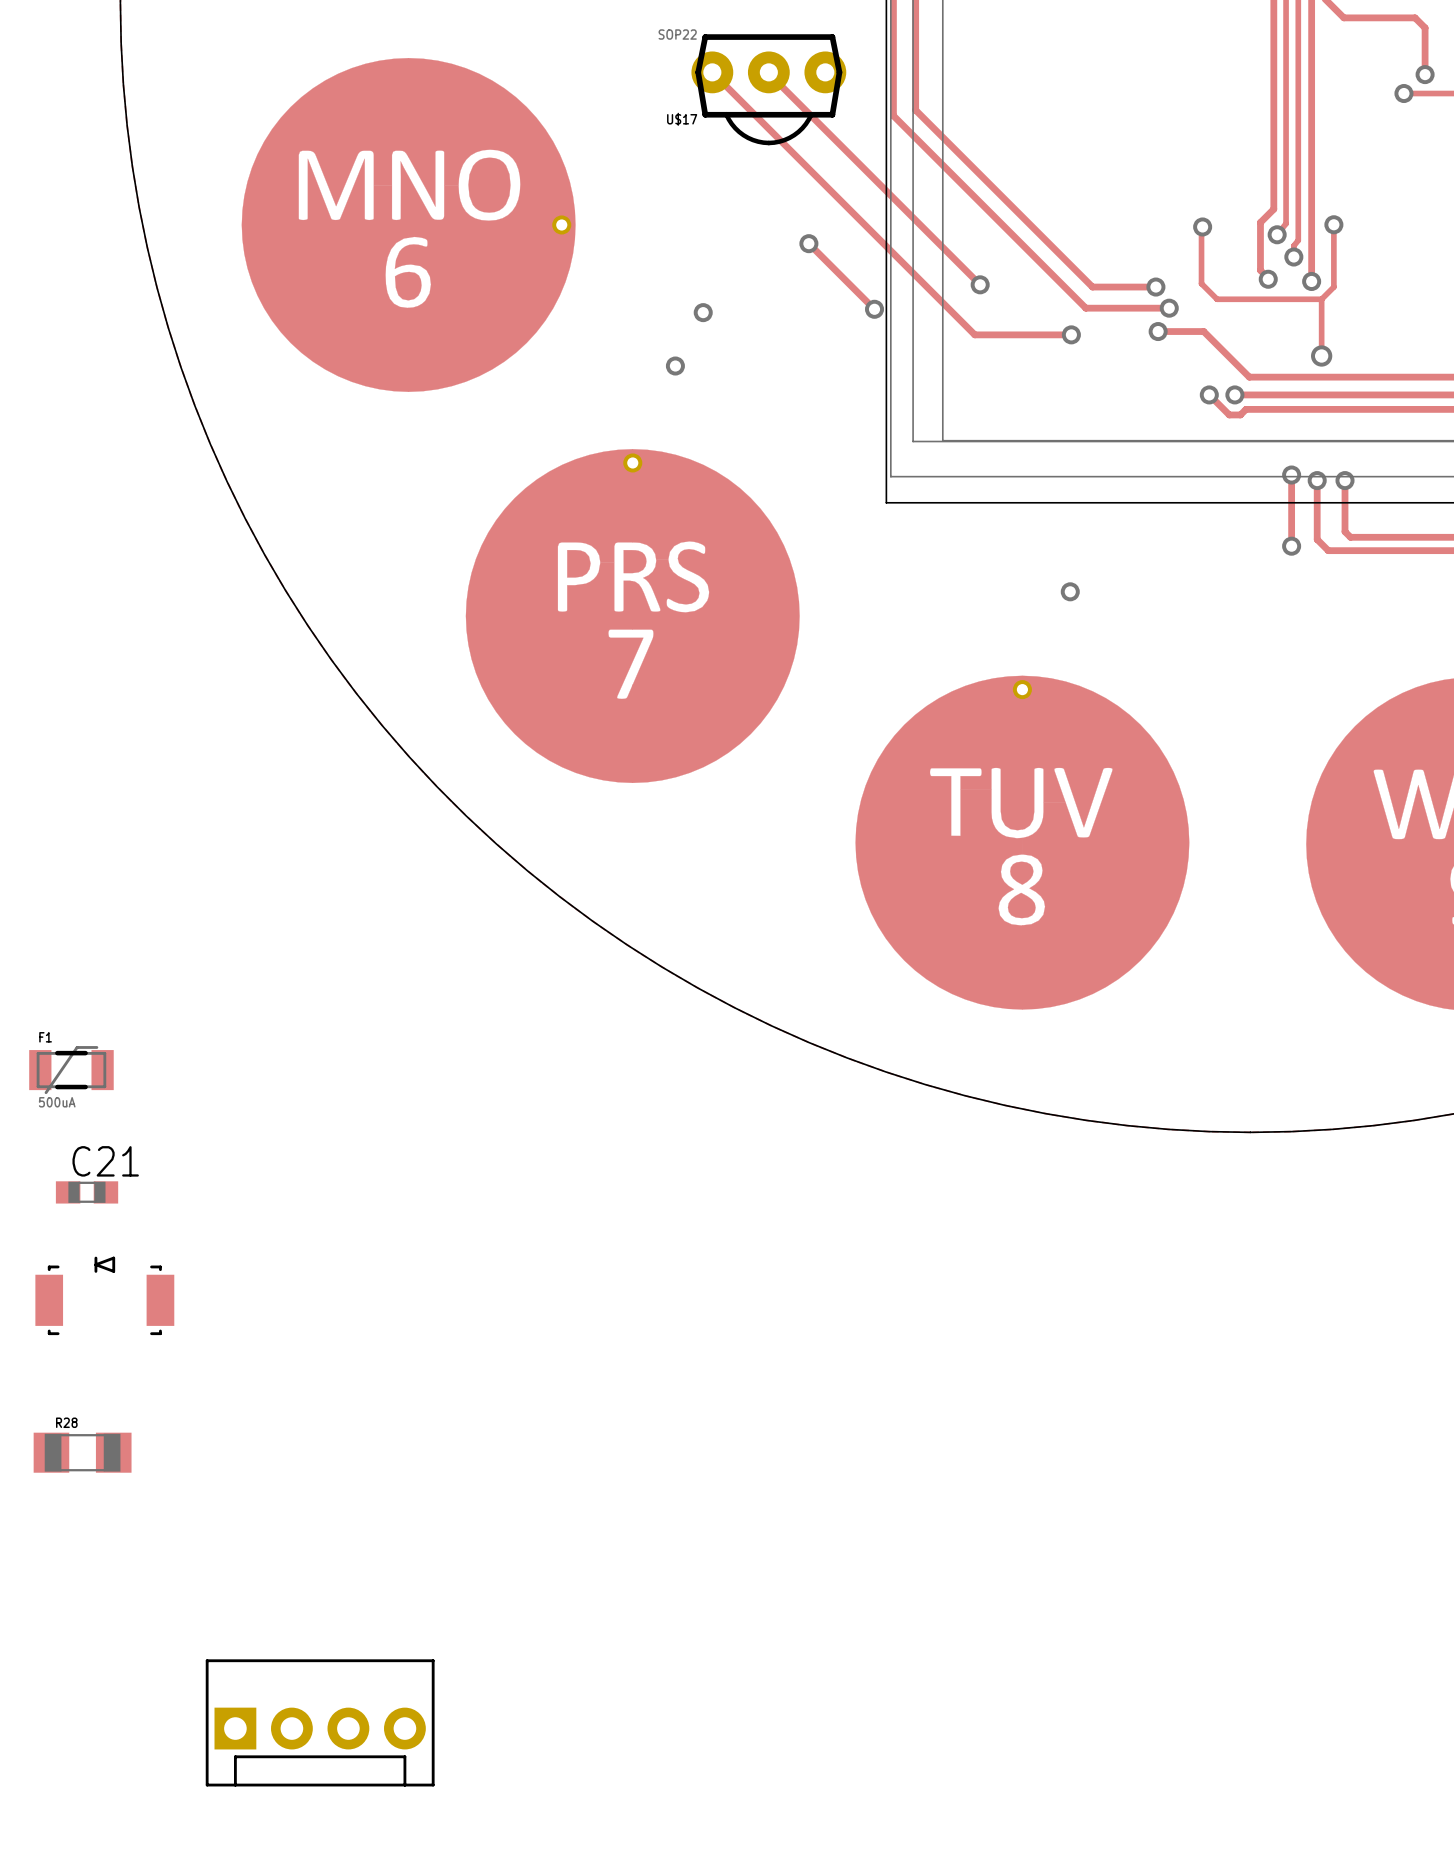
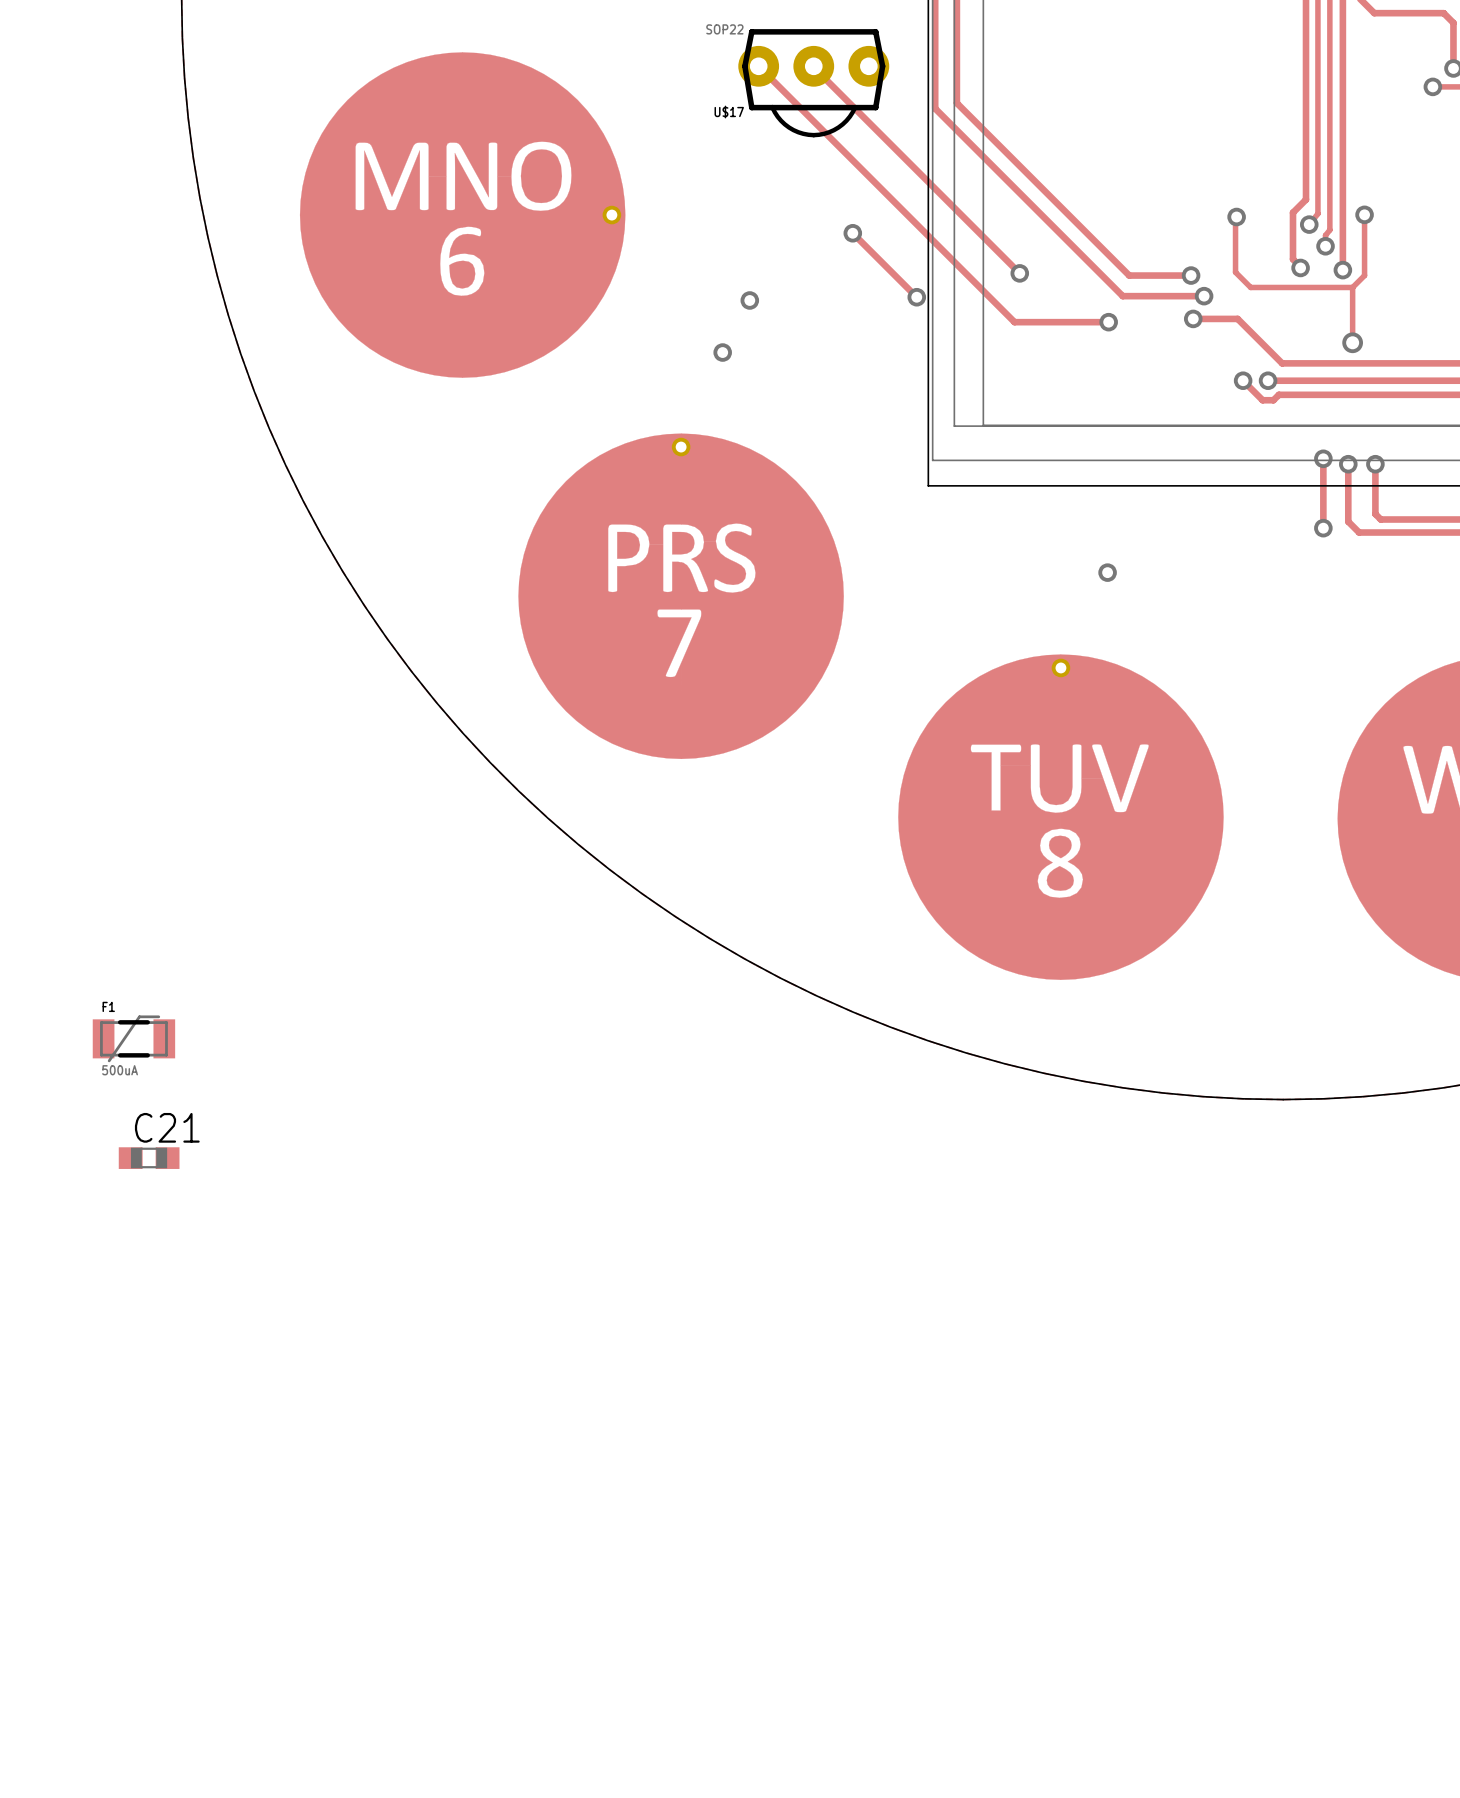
part: (104, 1295) -> none
R28: (82, 1452) -> none
part: (320, 1722) -> none

